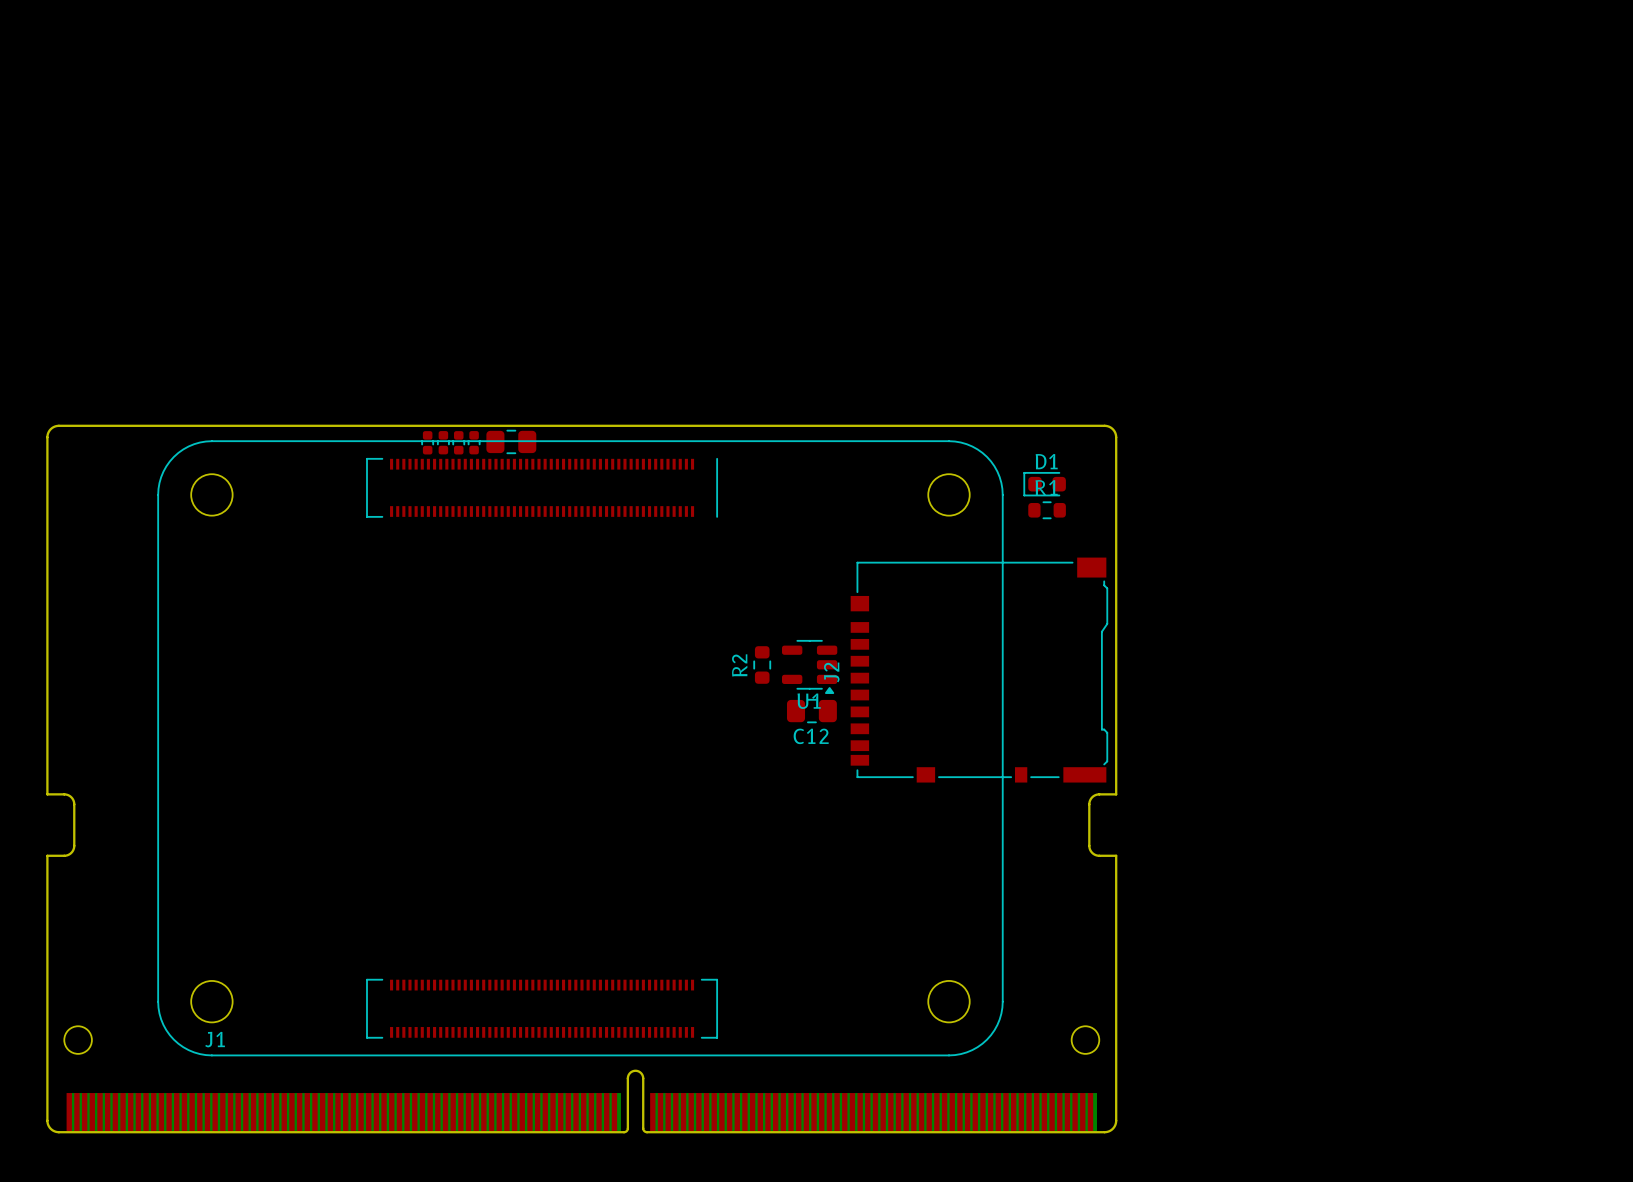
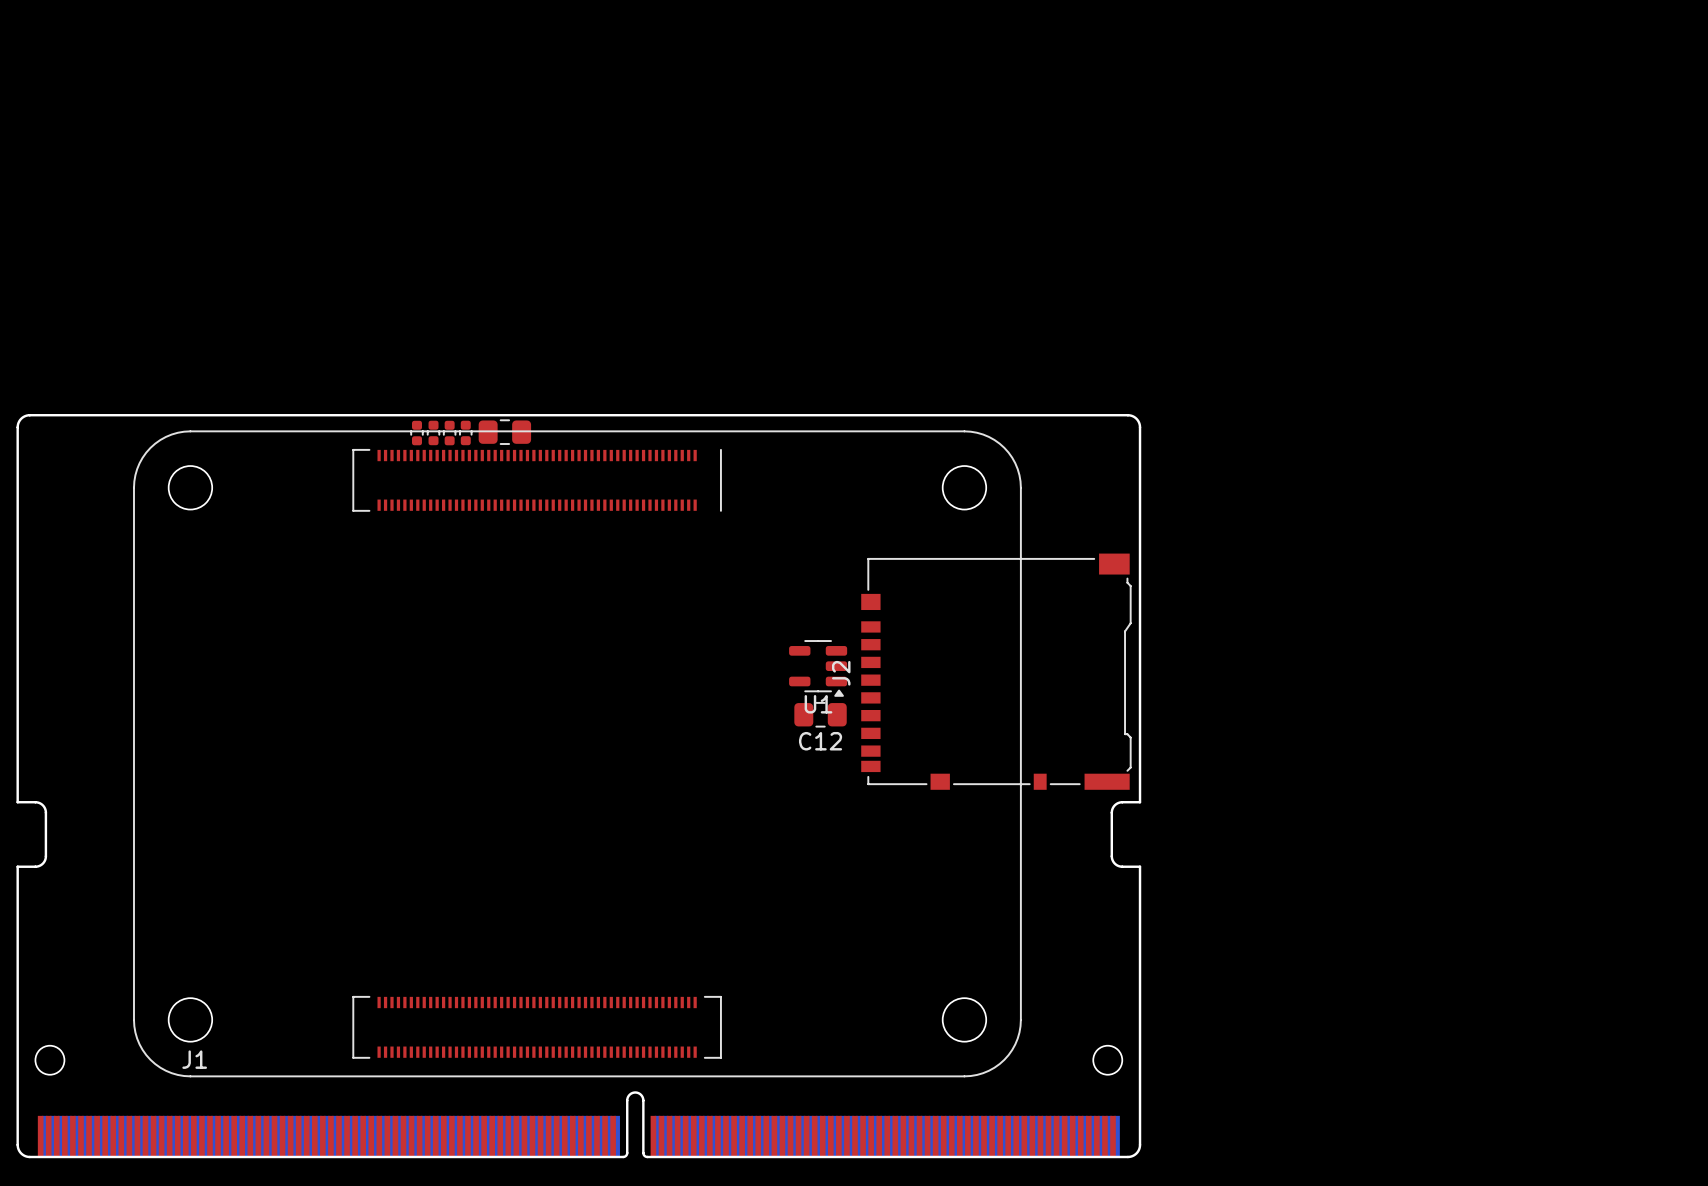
D1: (1044, 484) -> none
R1: (1047, 510) -> none
R2: (762, 664) -> none

